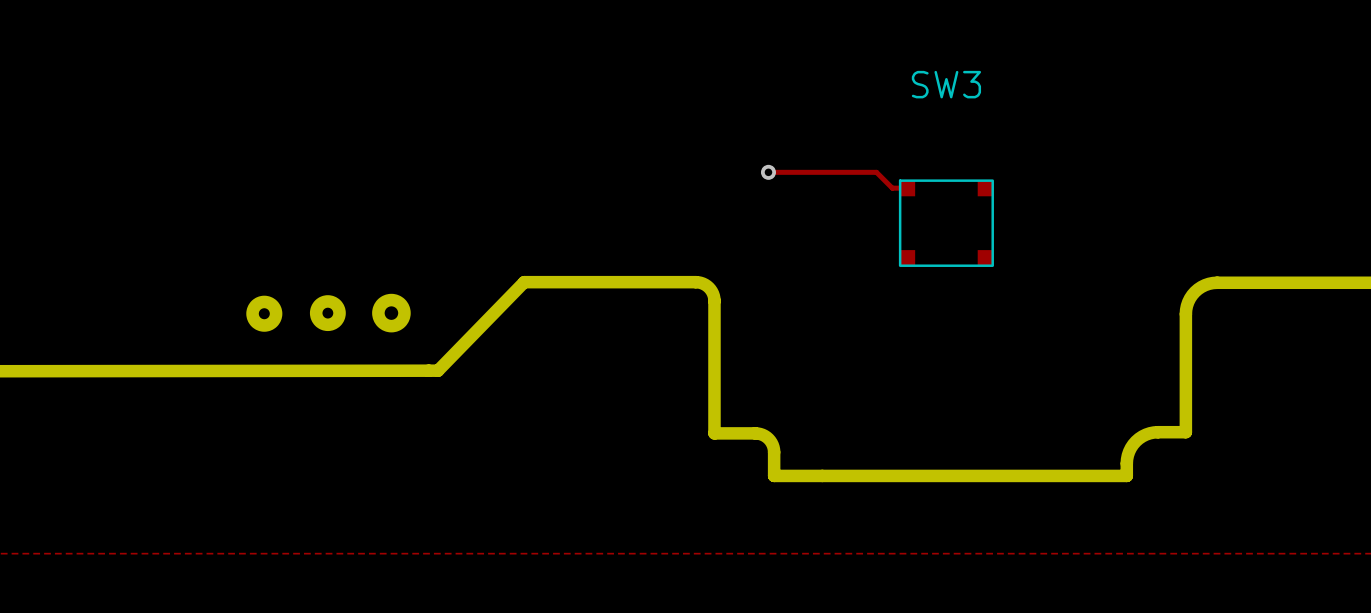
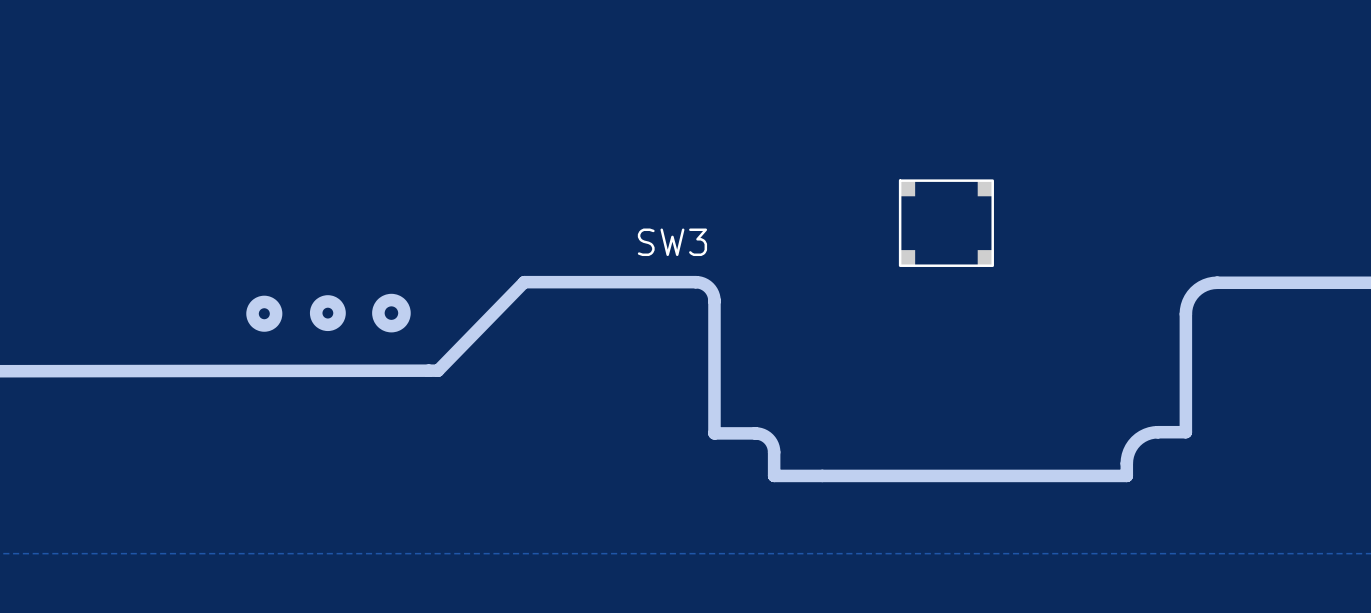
SW3 name position: SW3 (946, 84) -> SW3 (672, 242)
track: (768, 172) (876, 172) (892, 188) (907, 188) -> none
via: (768, 172) -> none

